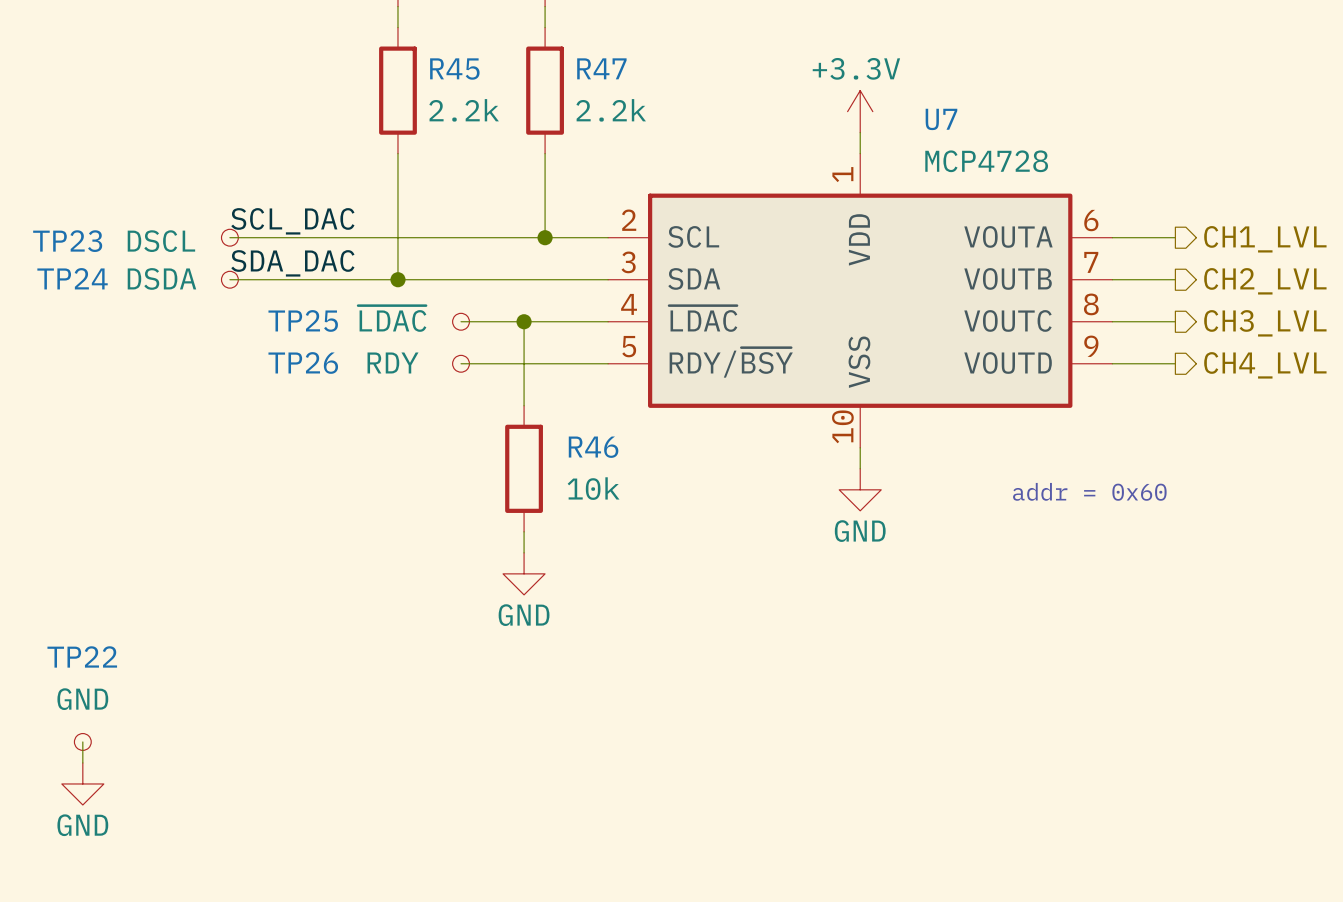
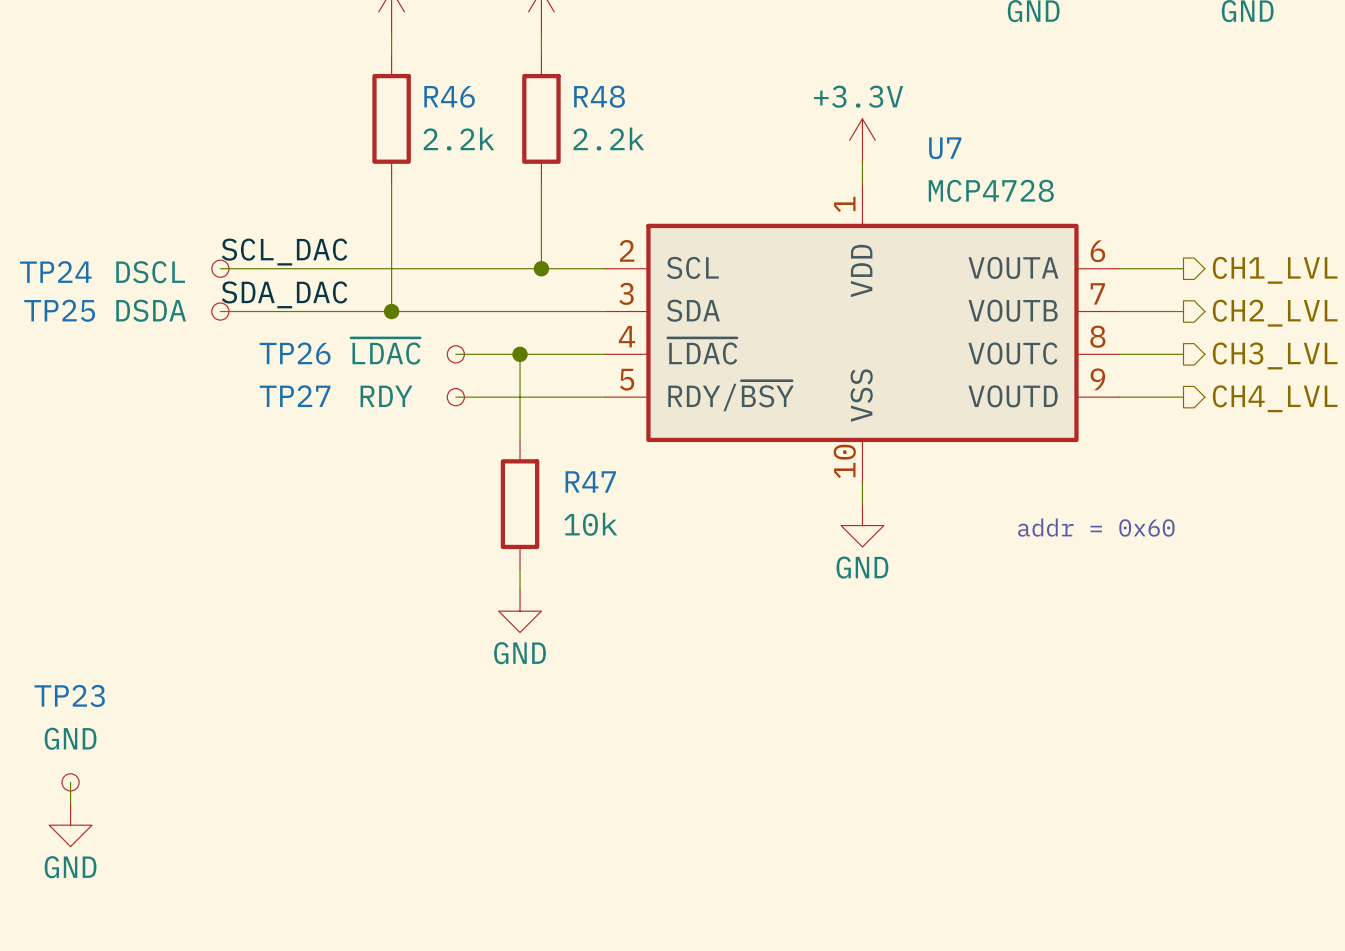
R47 name: R47 (601, 68) -> R48 (599, 96)
R45 name: R45 (454, 69) -> R46 (449, 96)
TP23 name: TP23 (67, 241) -> TP24 (55, 272)
TP24 name: TP24 (72, 278) -> TP25 (59, 310)
TP25 name: TP25 (303, 320) -> TP26 (295, 353)
TP26 name: TP26 (303, 362) -> TP27 (295, 396)
R46 name: R46 (593, 447) -> R47 (590, 481)
TP22 name: TP22 (82, 656) -> TP23 (69, 695)

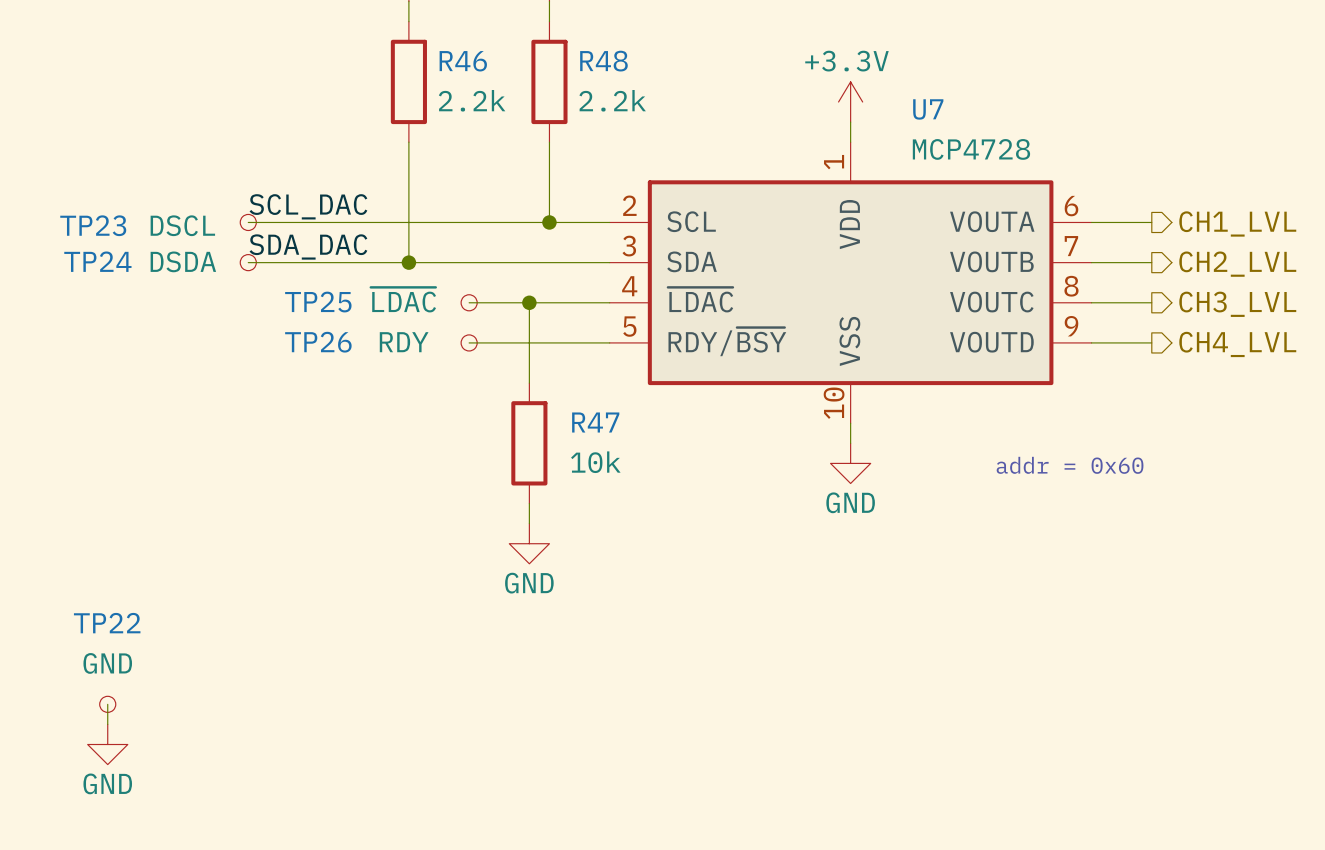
TP24 name: TP24 (55, 272) -> TP23 (93, 225)
TP25 name: TP25 (59, 310) -> TP24 (97, 261)
TP26 name: TP26 (295, 353) -> TP25 (318, 302)
TP27 name: TP27 (295, 396) -> TP26 (318, 342)
TP23 name: TP23 (69, 695) -> TP22 (107, 623)

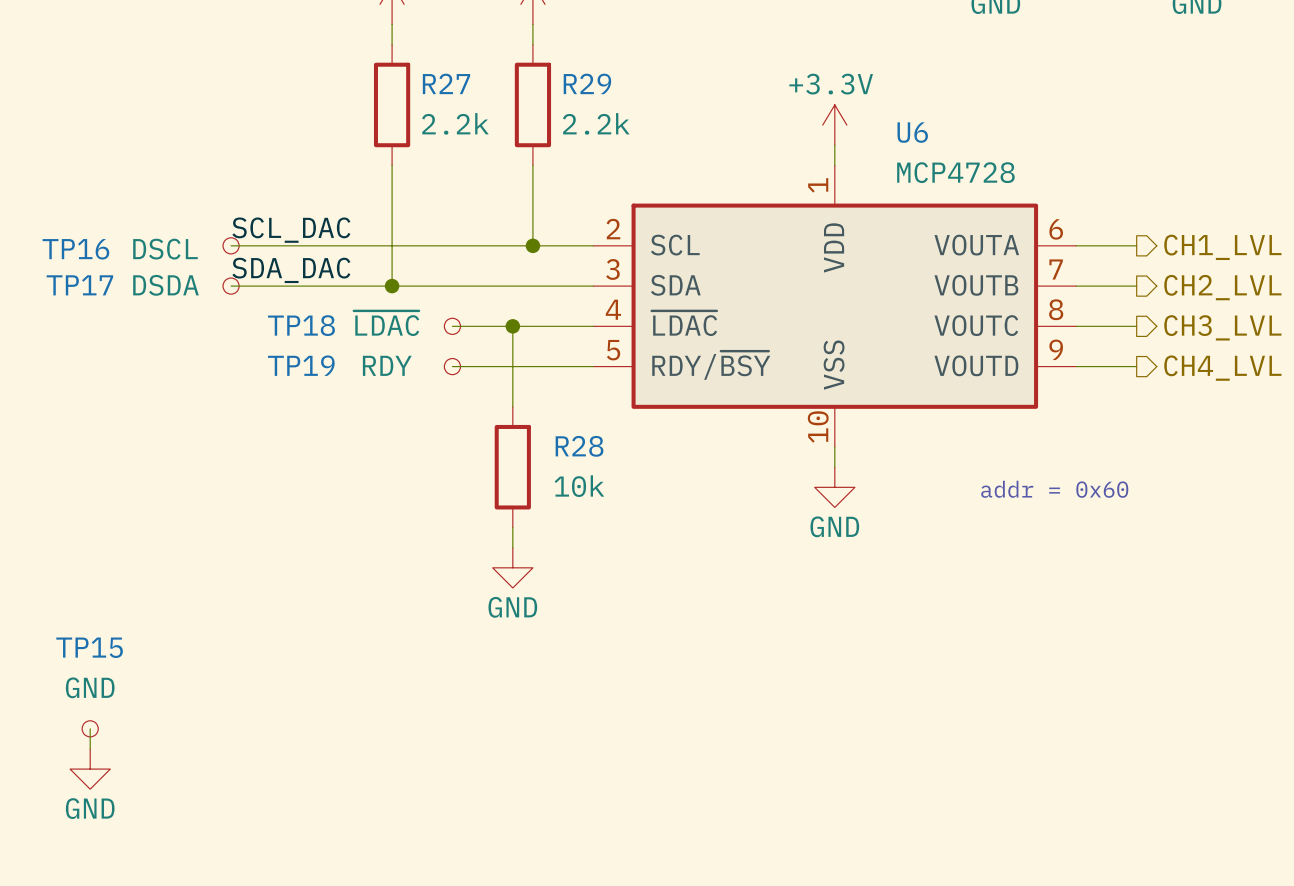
R46 name: R46 (463, 61) -> R27 (446, 83)
R48 name: R48 (603, 61) -> R29 (587, 83)
U7 name: U7 (928, 109) -> U6 (912, 132)
TP23 name: TP23 (93, 225) -> TP16 (75, 249)
TP24 name: TP24 (97, 261) -> TP17 (79, 285)
TP25 name: TP25 (318, 302) -> TP18 (301, 325)
TP26 name: TP26 (318, 342) -> TP19 (301, 365)
R47 name: R47 (595, 422) -> R28 (579, 446)
TP22 name: TP22 (107, 623) -> TP15 (89, 647)

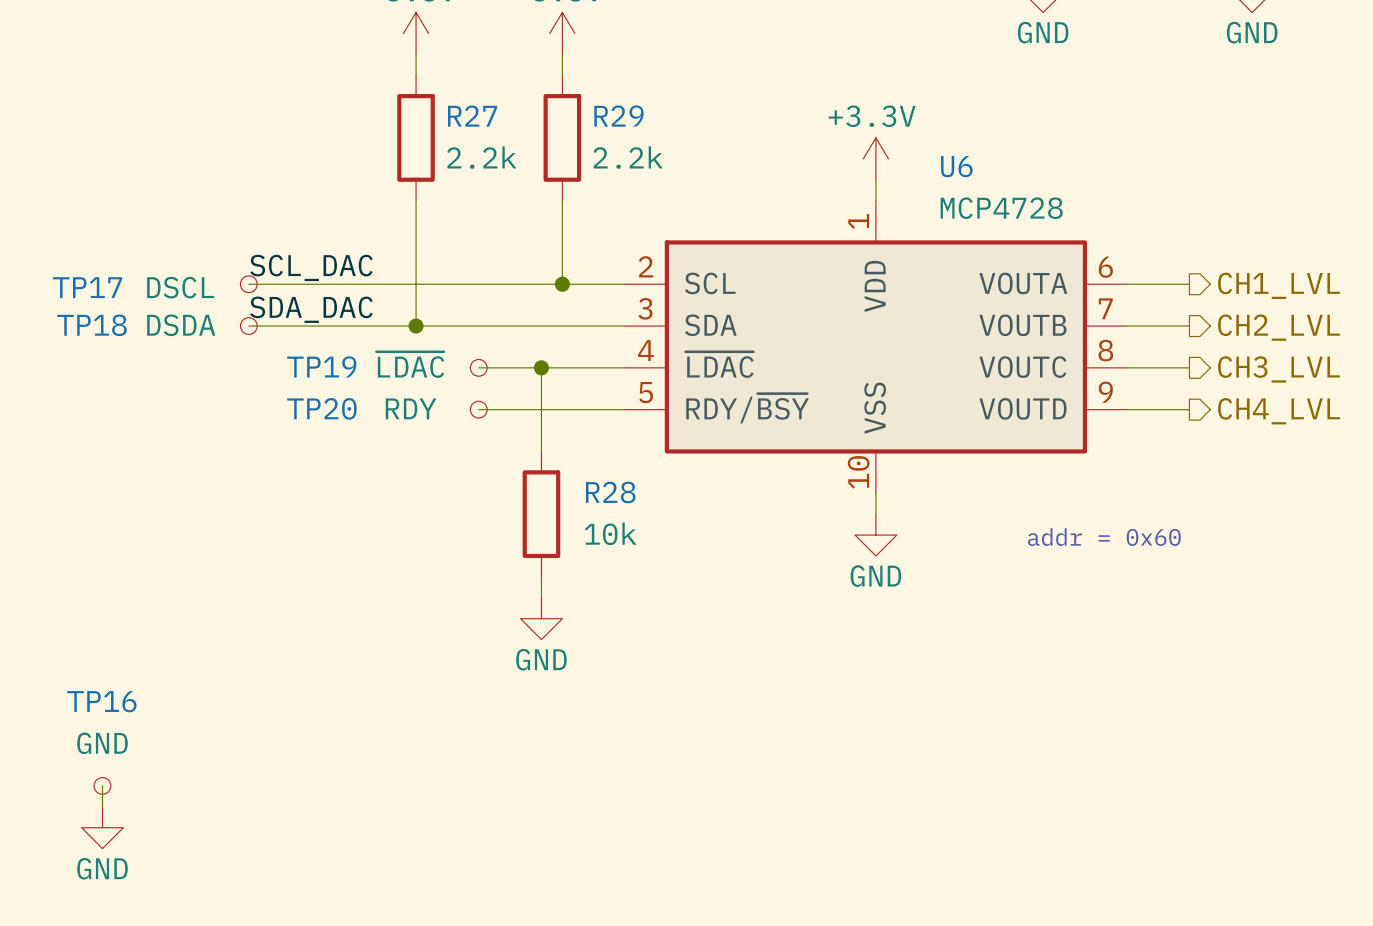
TP16 name: TP16 (75, 249) -> TP17 (87, 287)
TP17 name: TP17 (79, 285) -> TP18 (92, 325)
TP18 name: TP18 (301, 325) -> TP19 (321, 366)
TP19 name: TP19 (301, 365) -> TP20 (321, 408)
TP15 name: TP15 (89, 647) -> TP16 (101, 701)

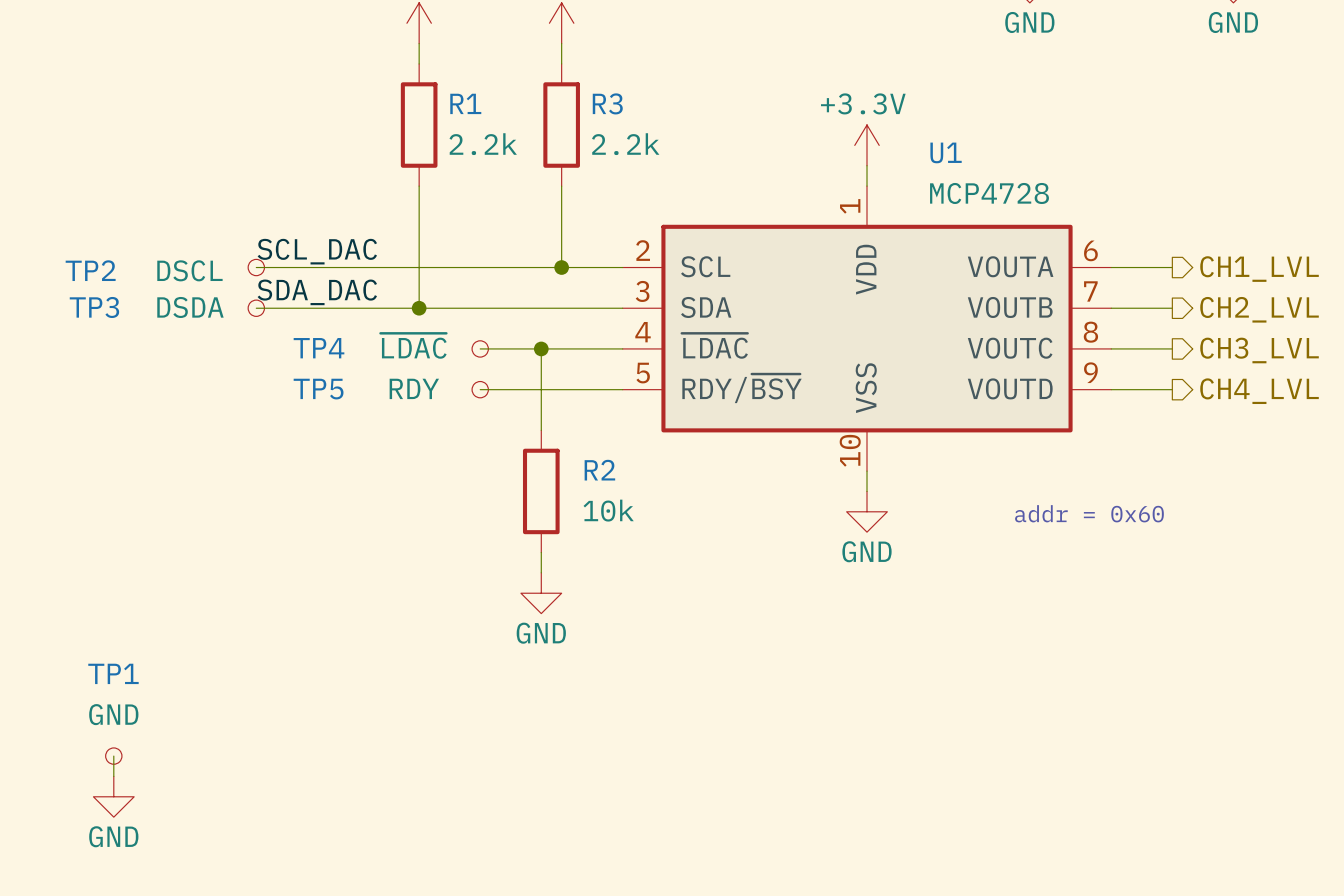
R27 name: R27 (472, 116) -> R1 (465, 103)
R29 name: R29 (618, 116) -> R3 (607, 103)
U6 name: U6 (956, 166) -> U1 (946, 152)
TP17 name: TP17 (87, 287) -> TP2 (90, 270)
TP18 name: TP18 (92, 325) -> TP3 (94, 307)
TP19 name: TP19 (321, 366) -> TP4 (319, 348)
TP20 name: TP20 (321, 408) -> TP5 (318, 389)
R28 name: R28 (610, 492) -> R2 (599, 470)
TP16 name: TP16 (101, 701) -> TP1 (113, 673)

